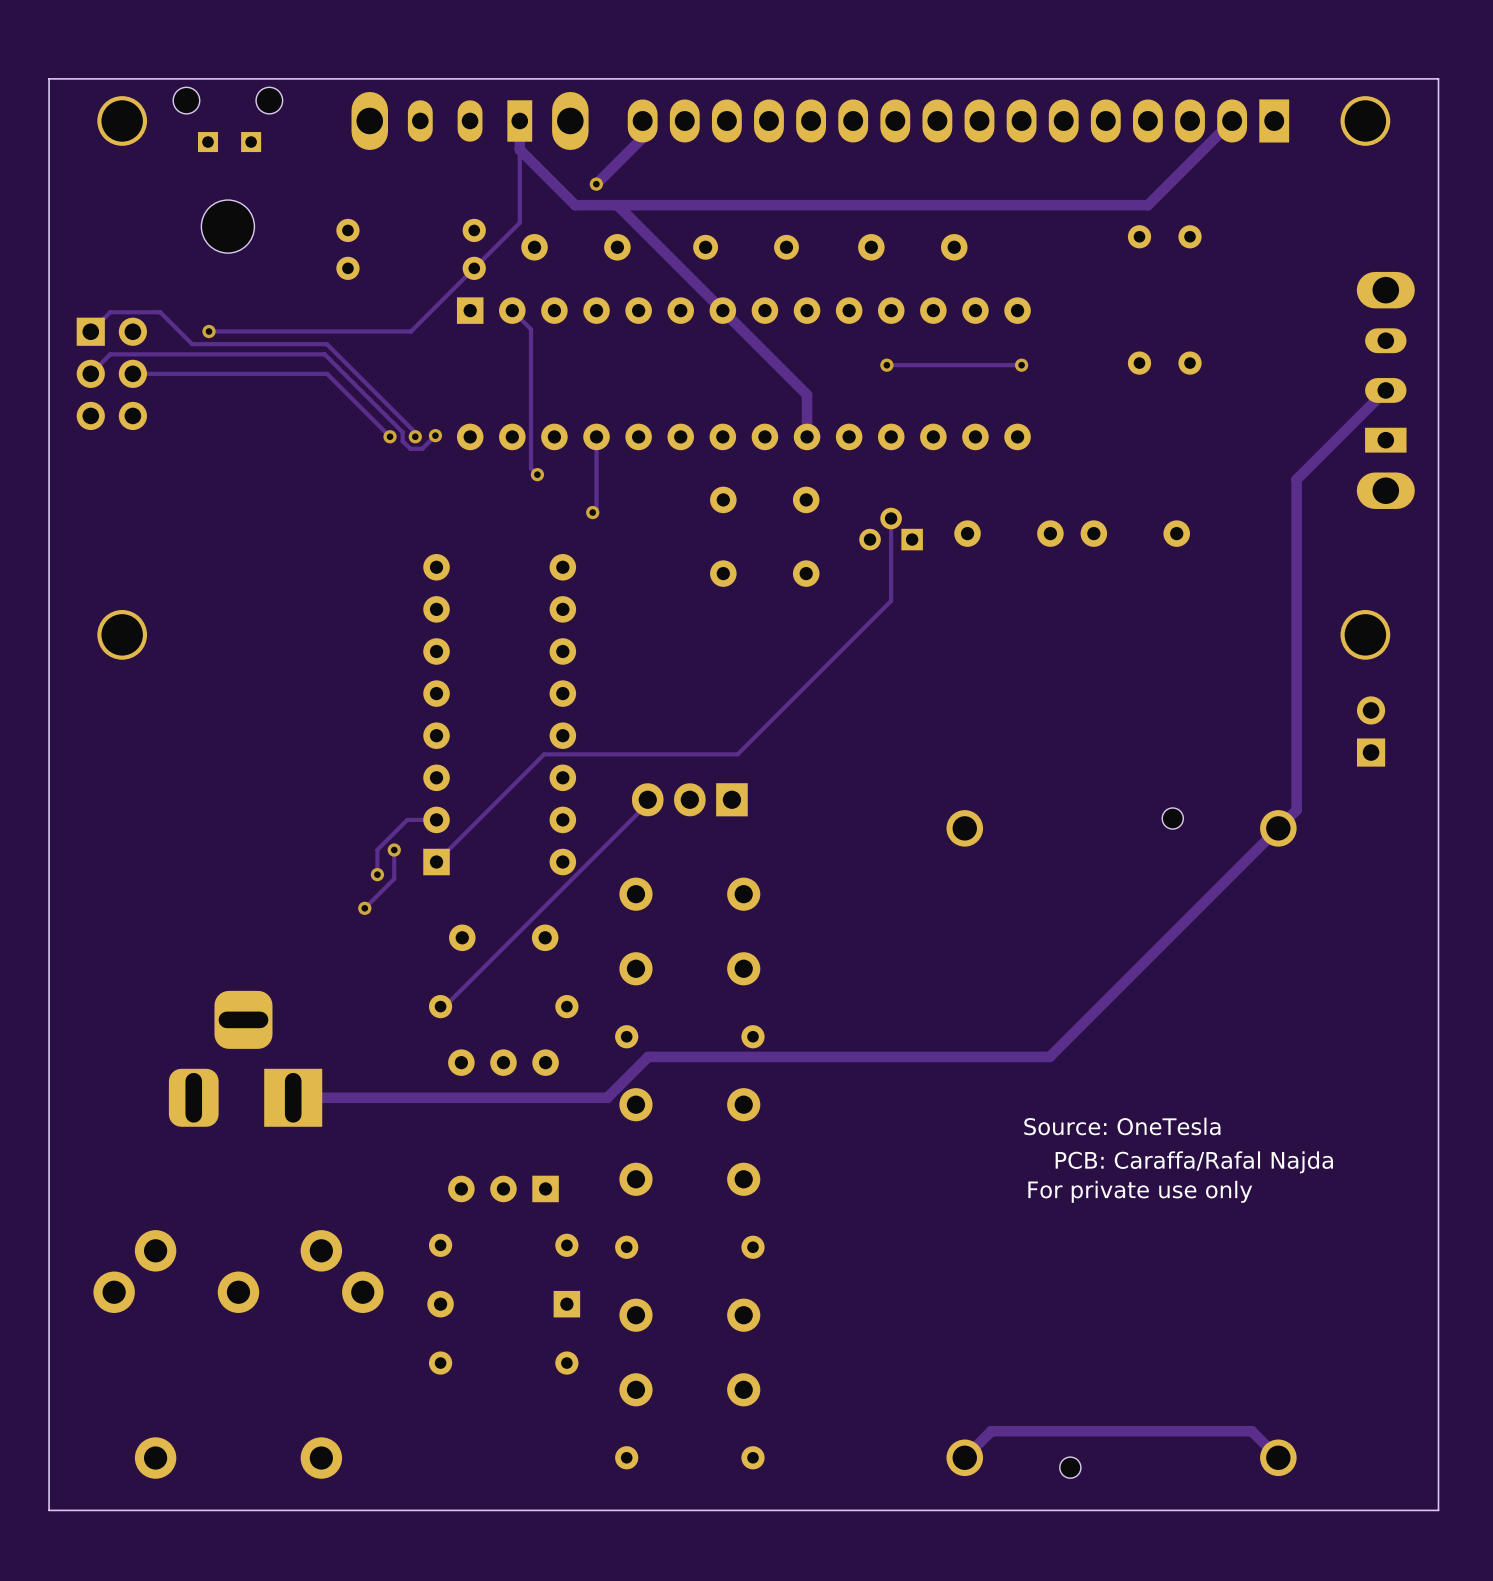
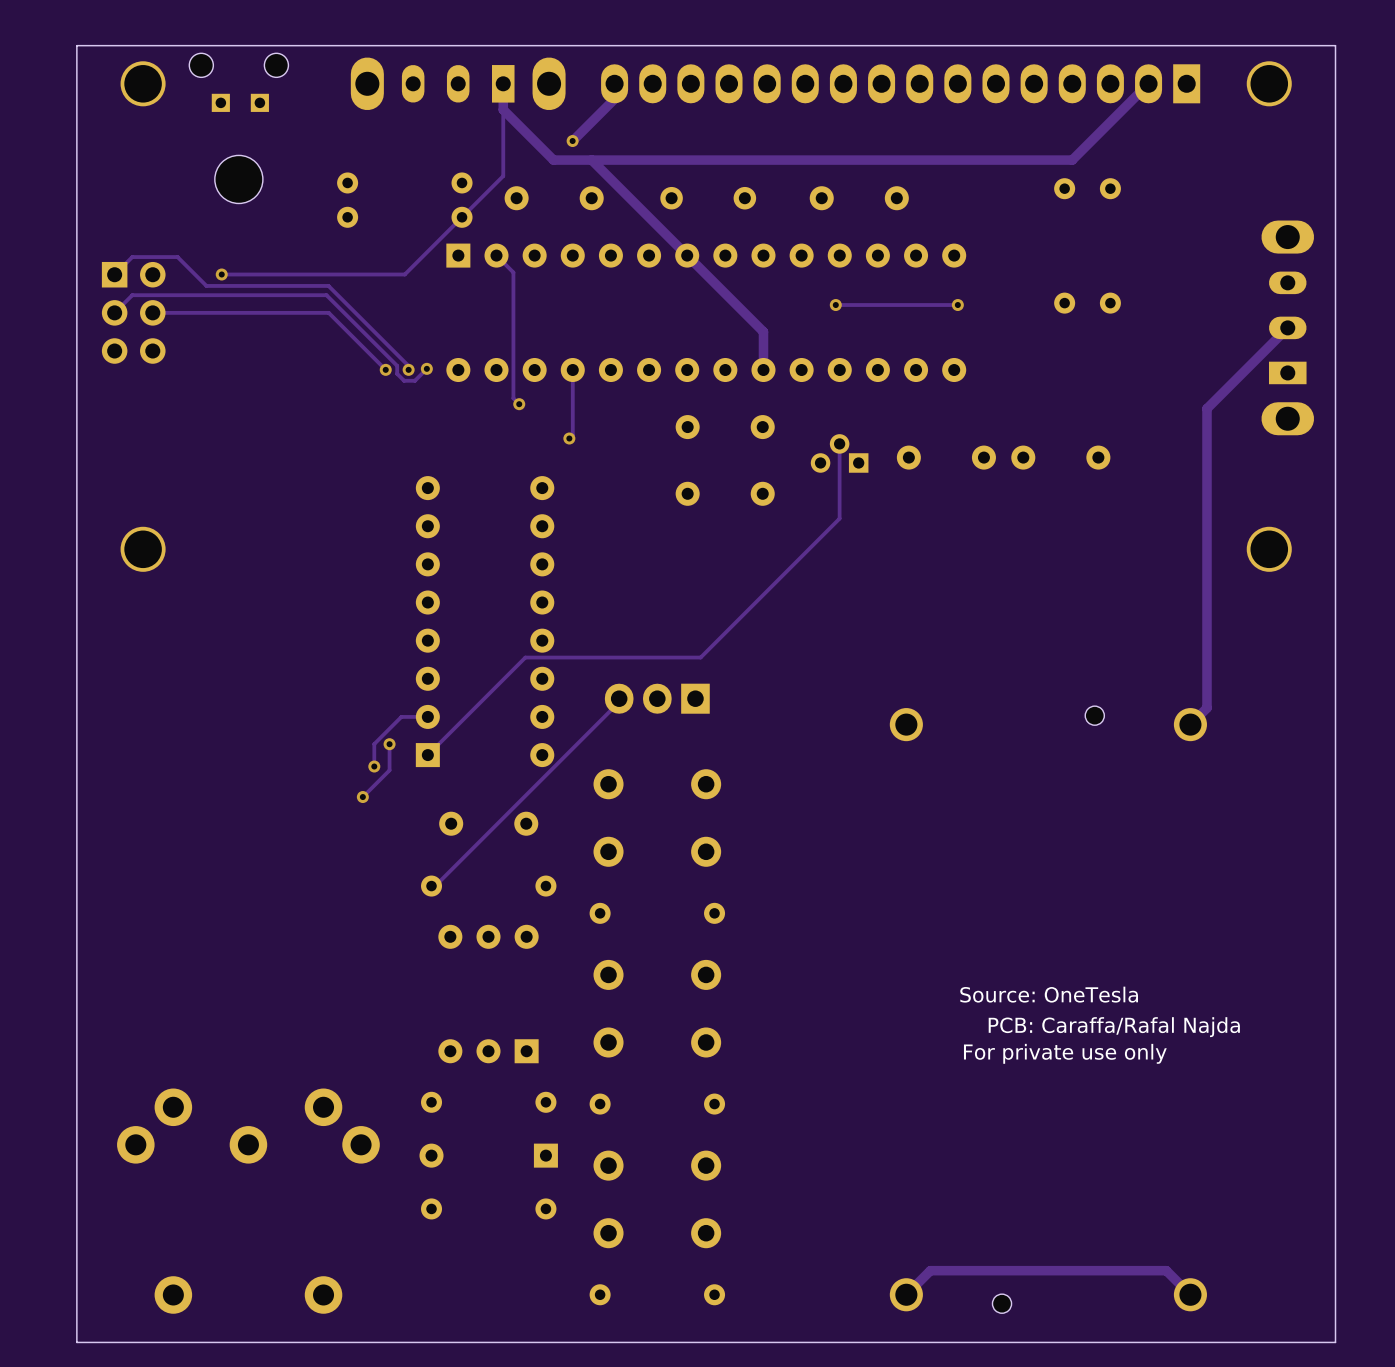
part: (1371, 731) -> none
track: (1278, 828) (1049, 1056) (648, 1056) (607, 1097) (293, 1097) -> none
part: (245, 1058) -> none

